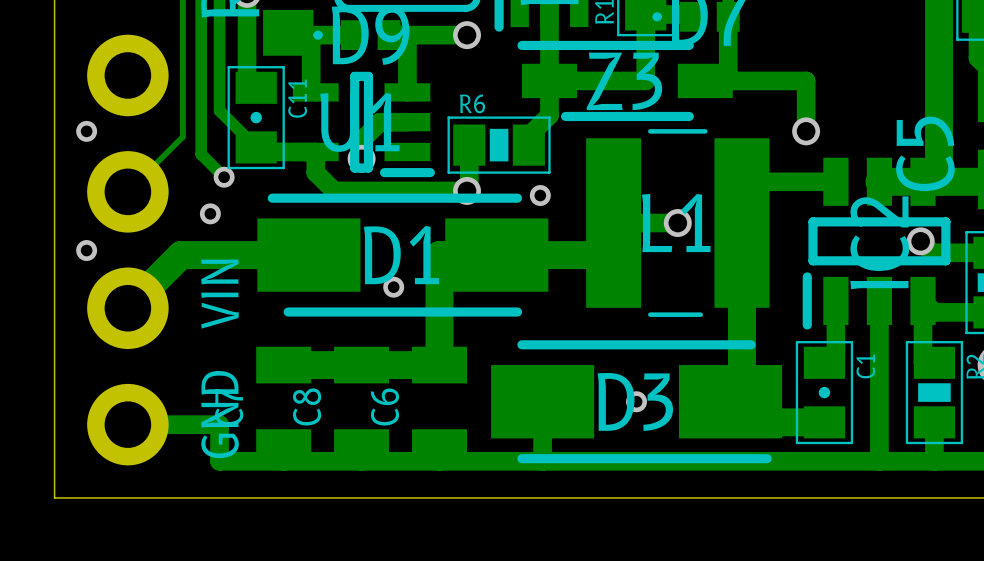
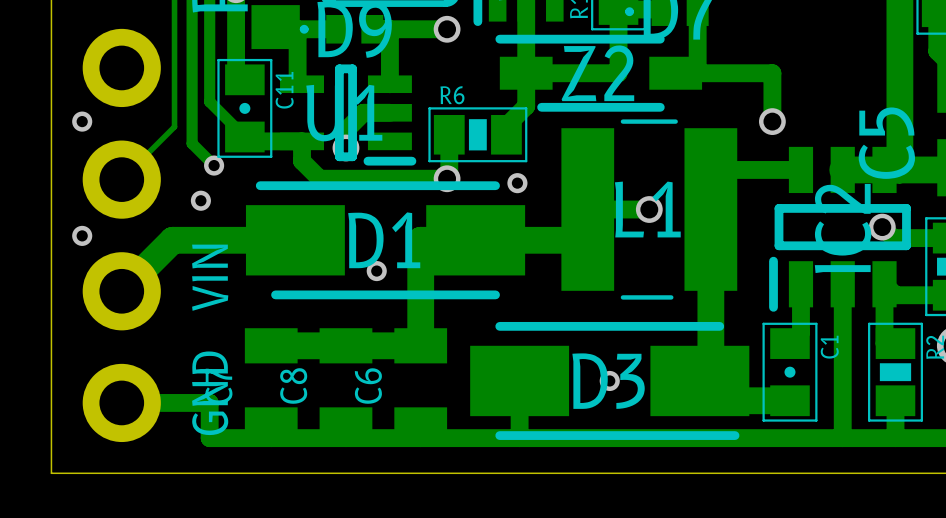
Z3 name: Z3 (624, 81) -> Z2 (597, 73)

